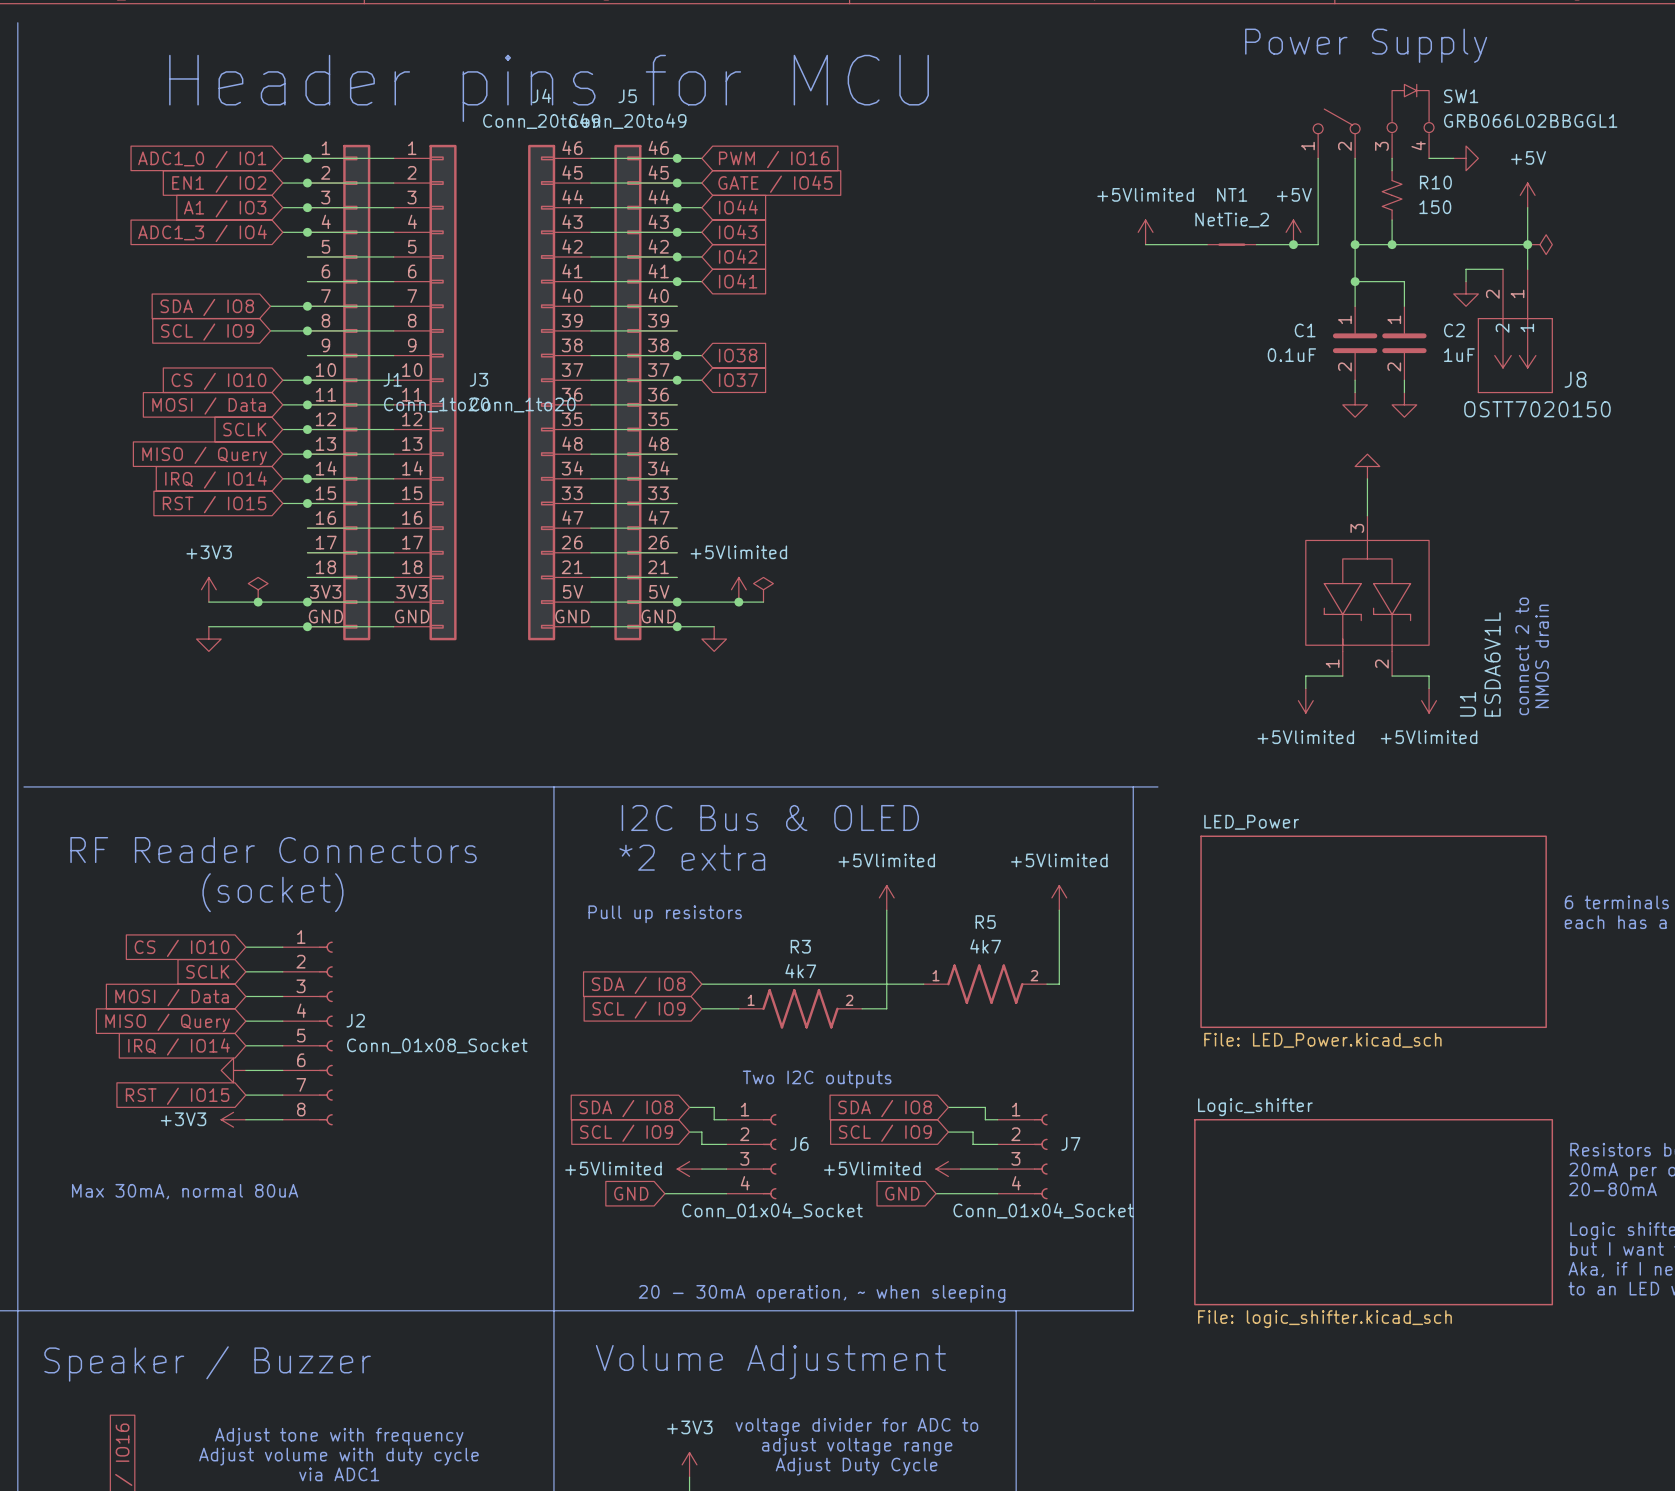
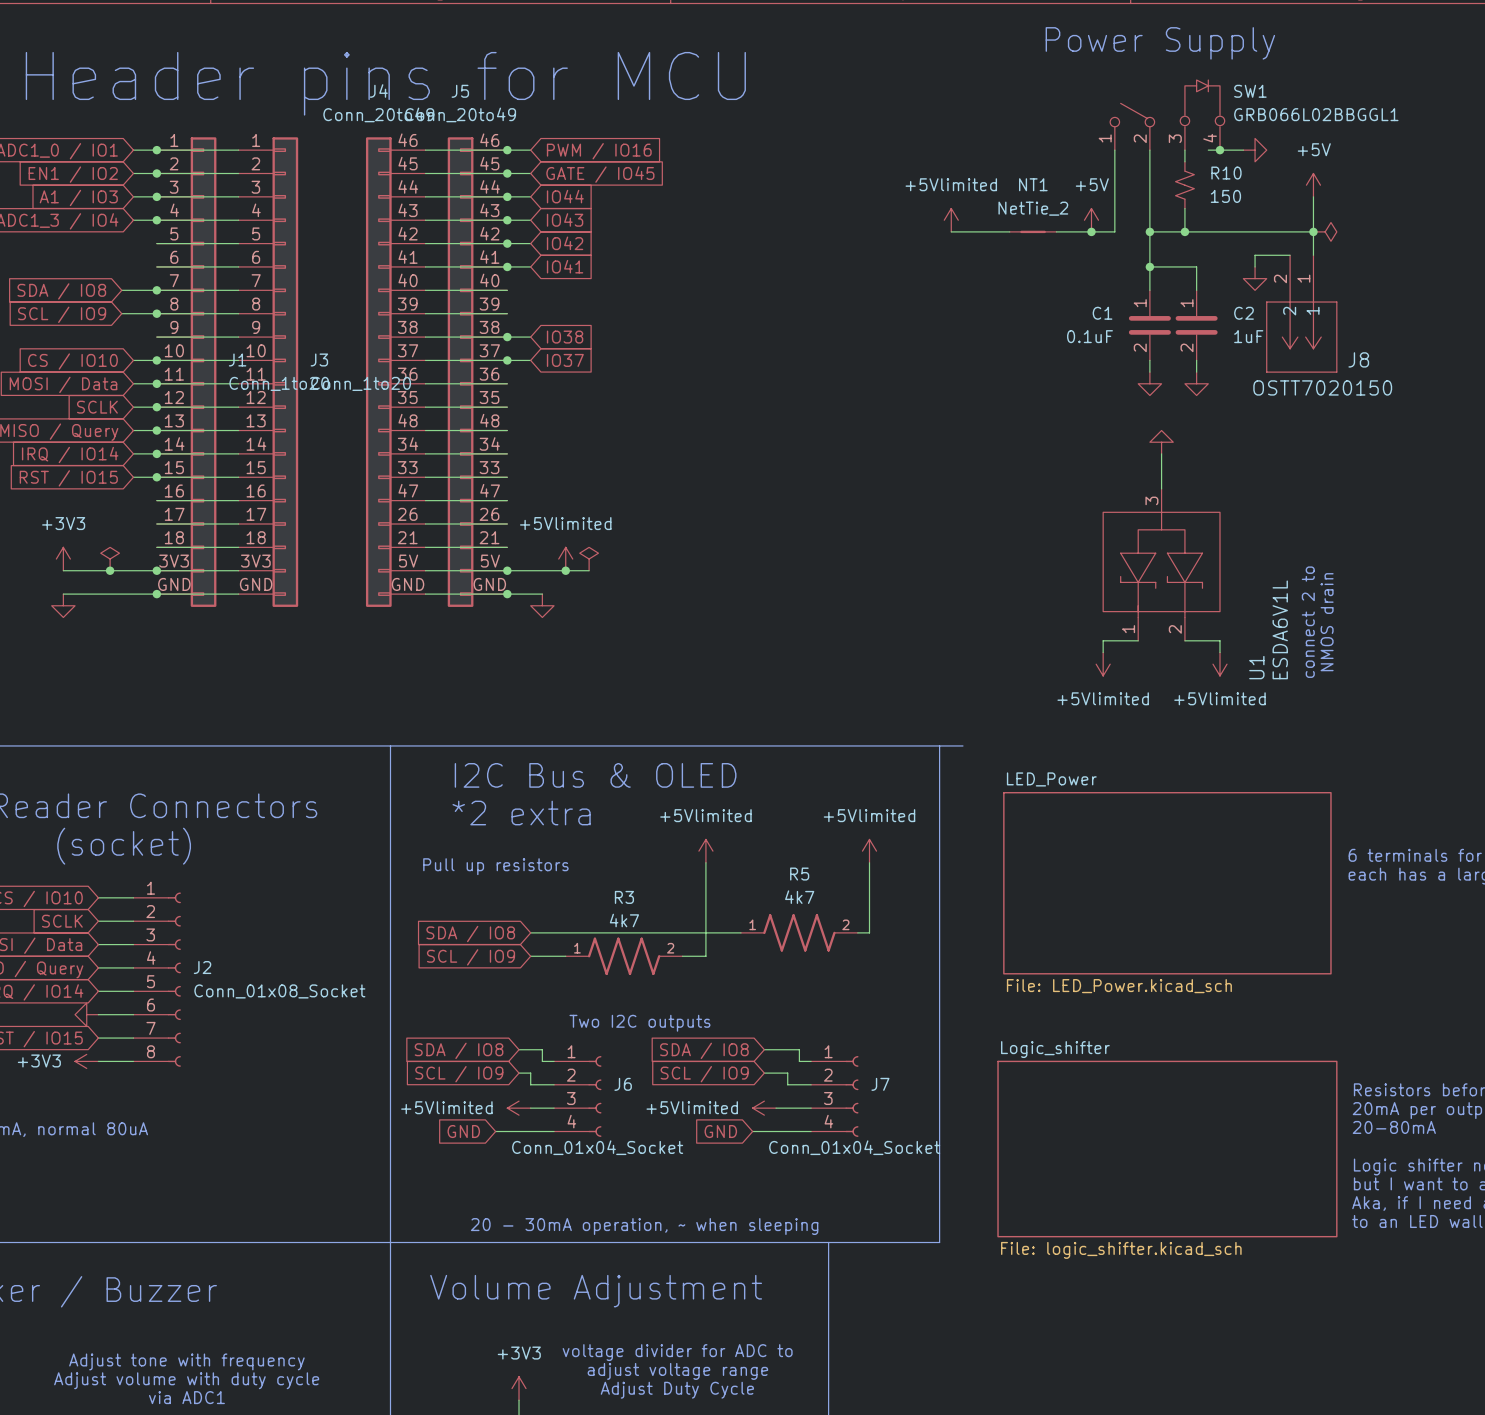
wire: none -> (1208, 150) (1219, 150)
junction: none -> (1219, 150)

